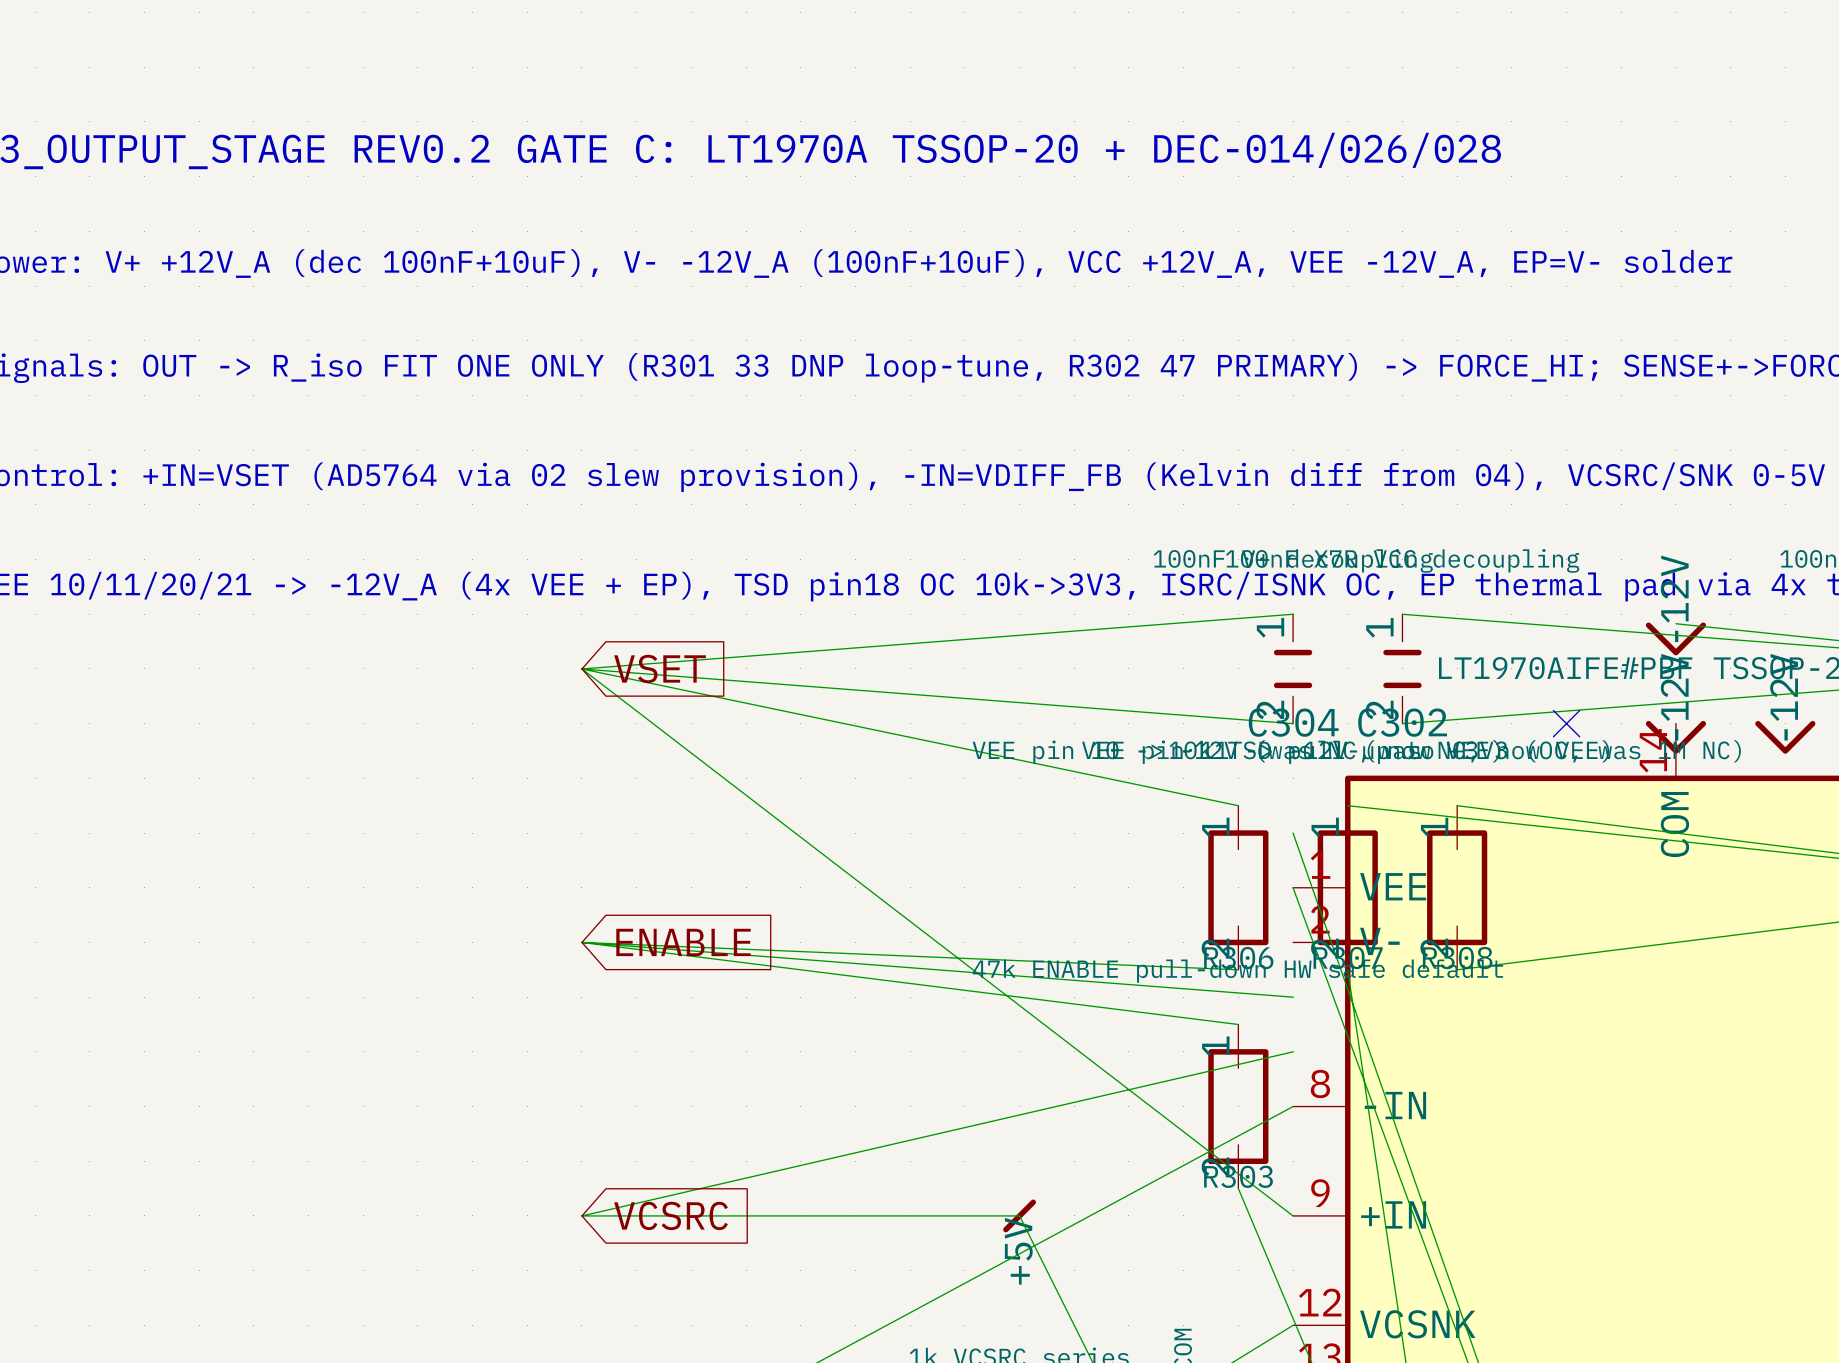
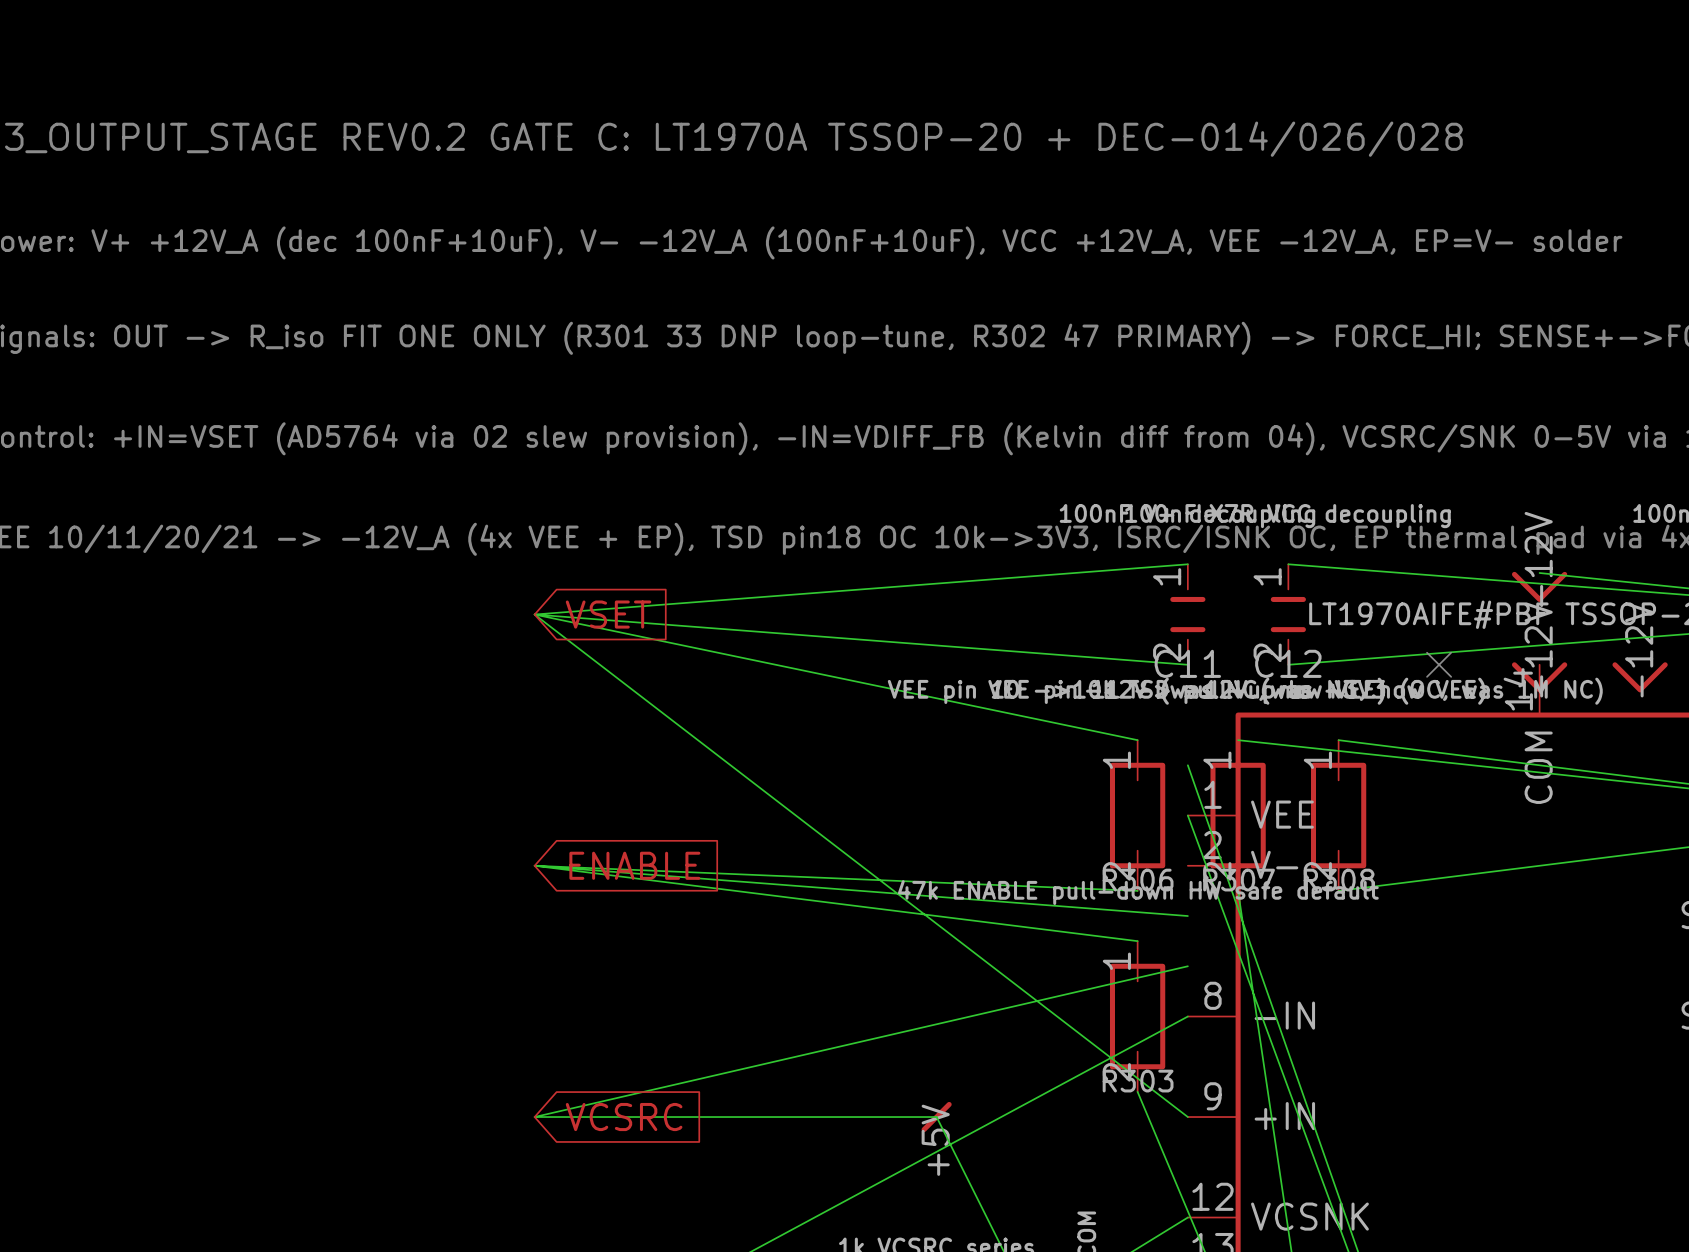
C304 name: C304 (1293, 722) -> C11 (1187, 663)
C302 name: C302 (1402, 722) -> C12 (1288, 663)

